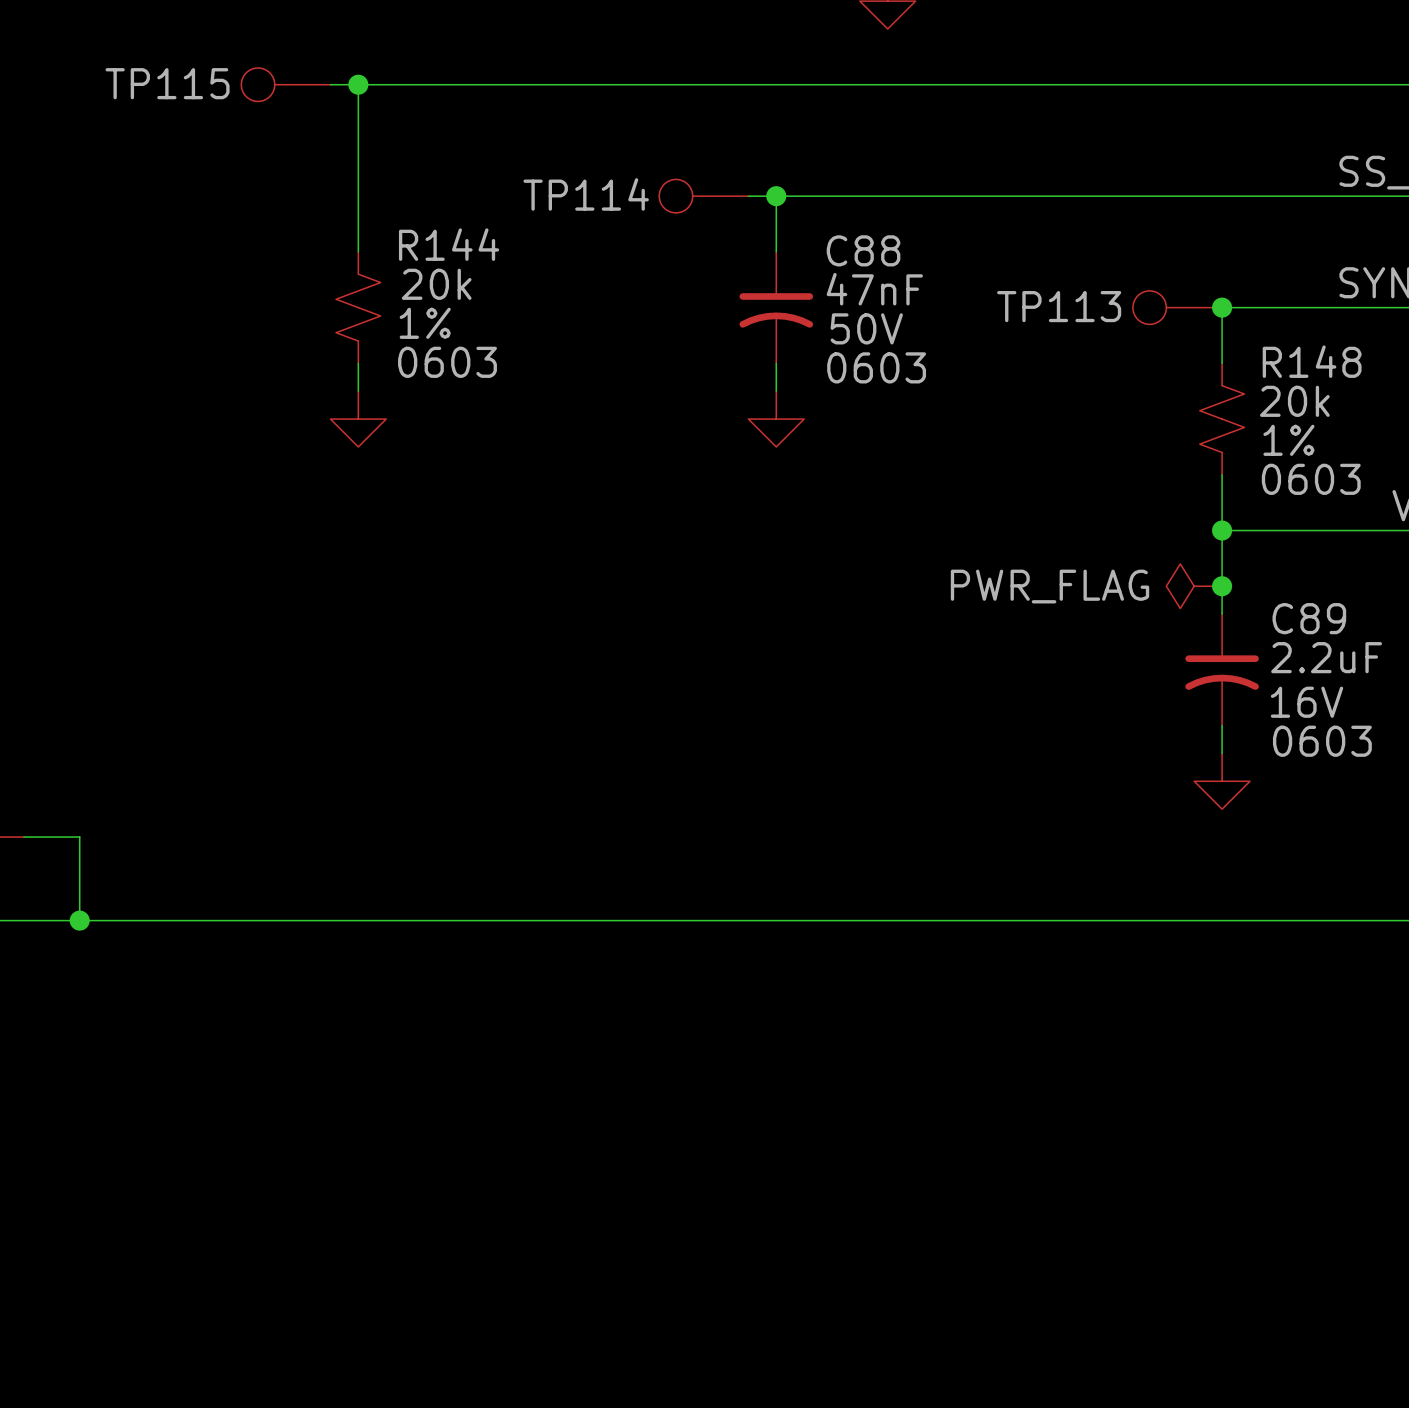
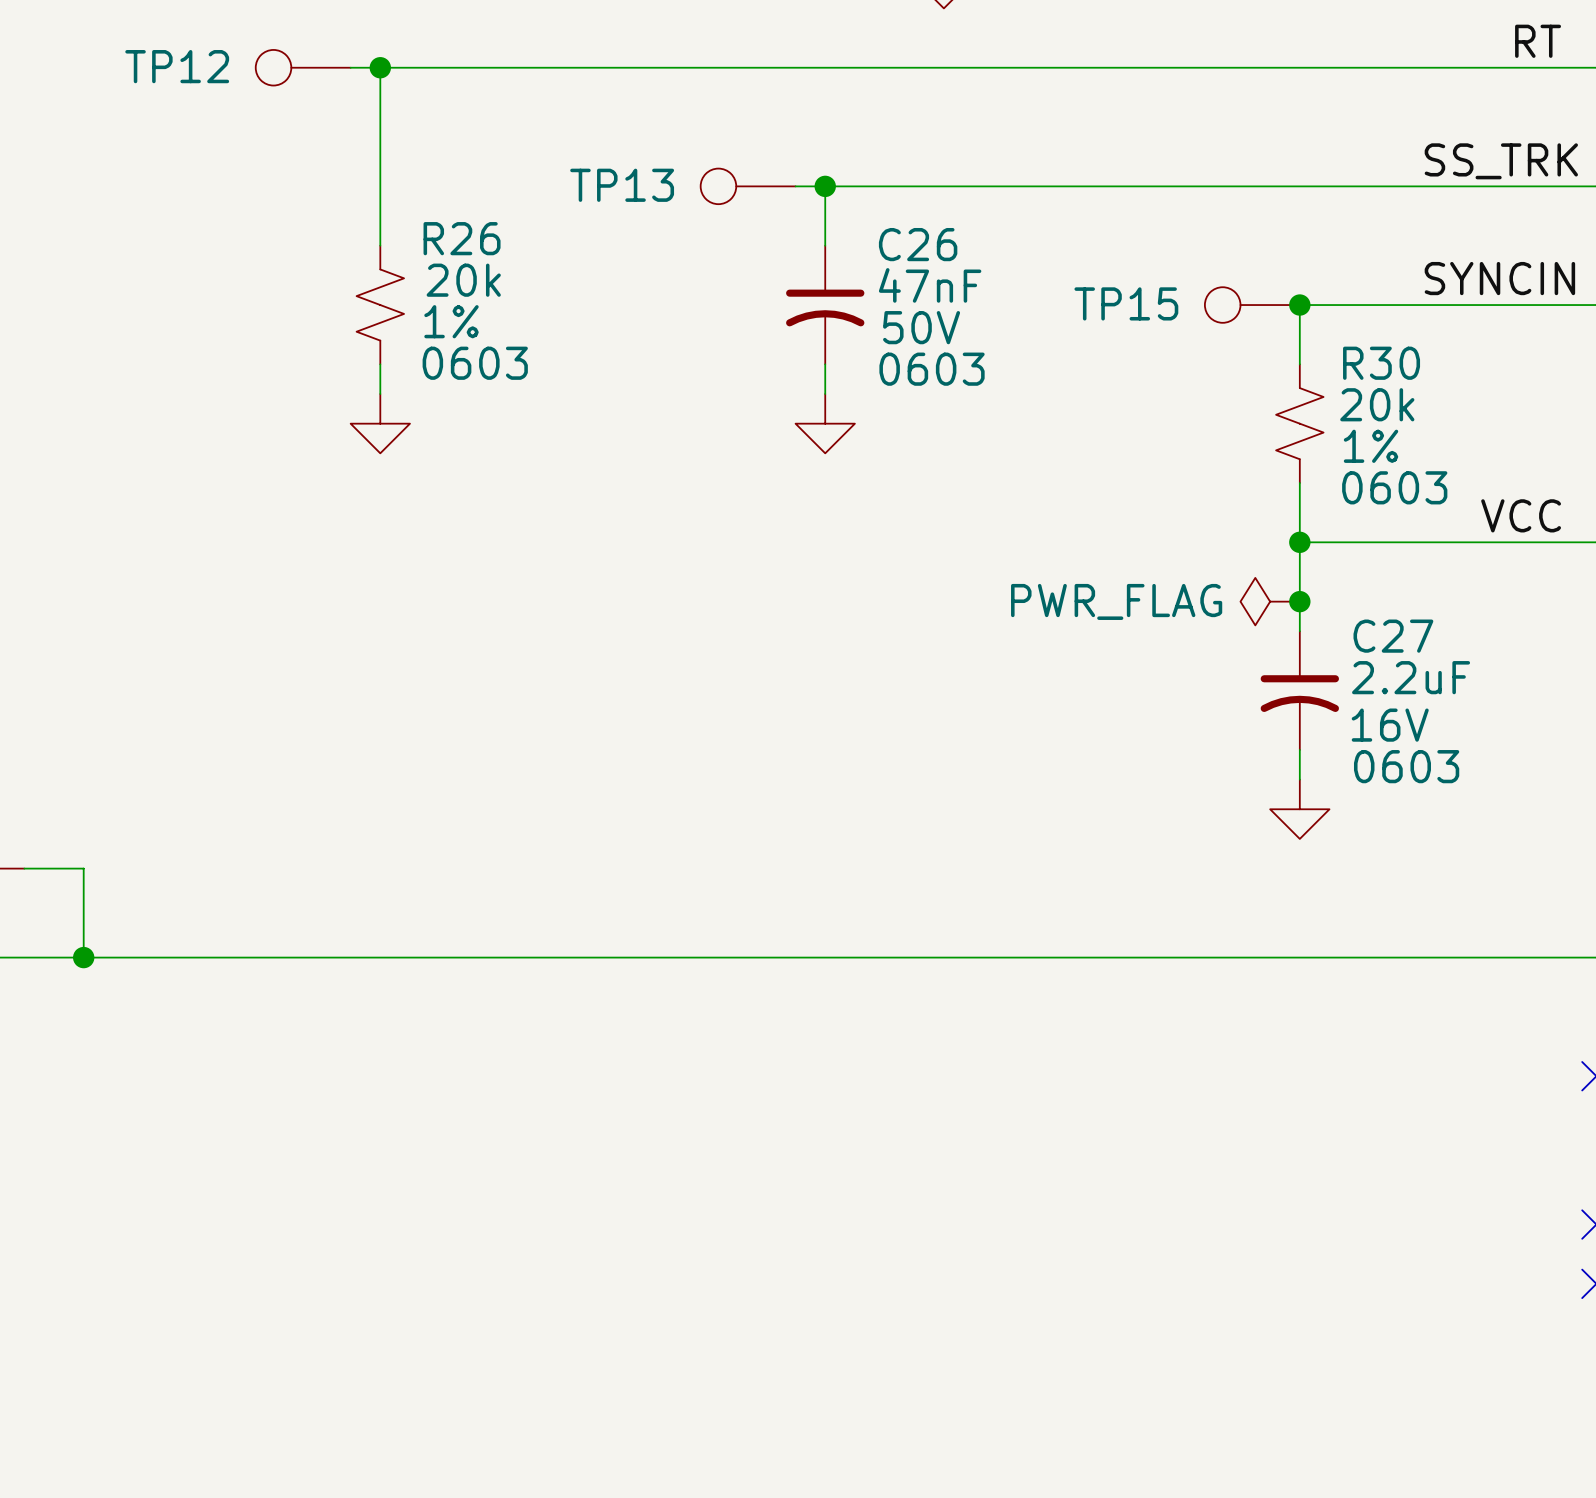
TP115 name: TP115 (167, 83) -> TP12 (177, 66)
TP114 name: TP114 (586, 194) -> TP13 (622, 185)
R144 name: R144 (449, 244) -> R26 (462, 238)
C88 name: C88 (863, 250) -> C26 (918, 244)
TP113 name: TP113 (1059, 306) -> TP15 (1126, 303)
R148 name: R148 (1312, 361) -> R30 (1381, 363)
C89 name: C89 (1309, 618) -> C27 (1393, 636)

